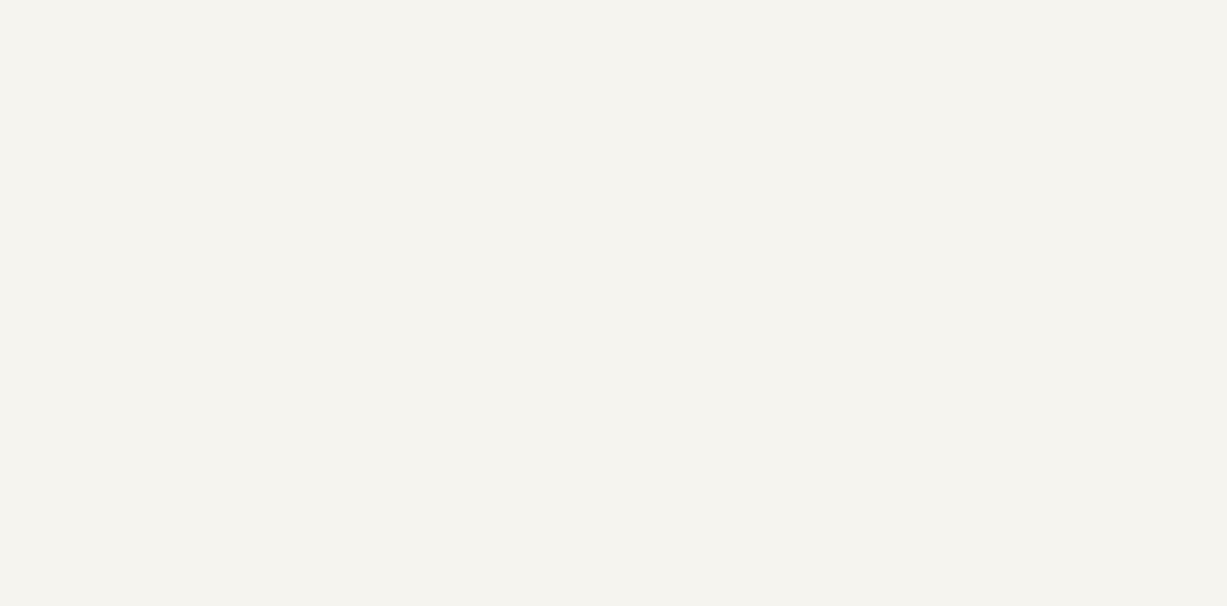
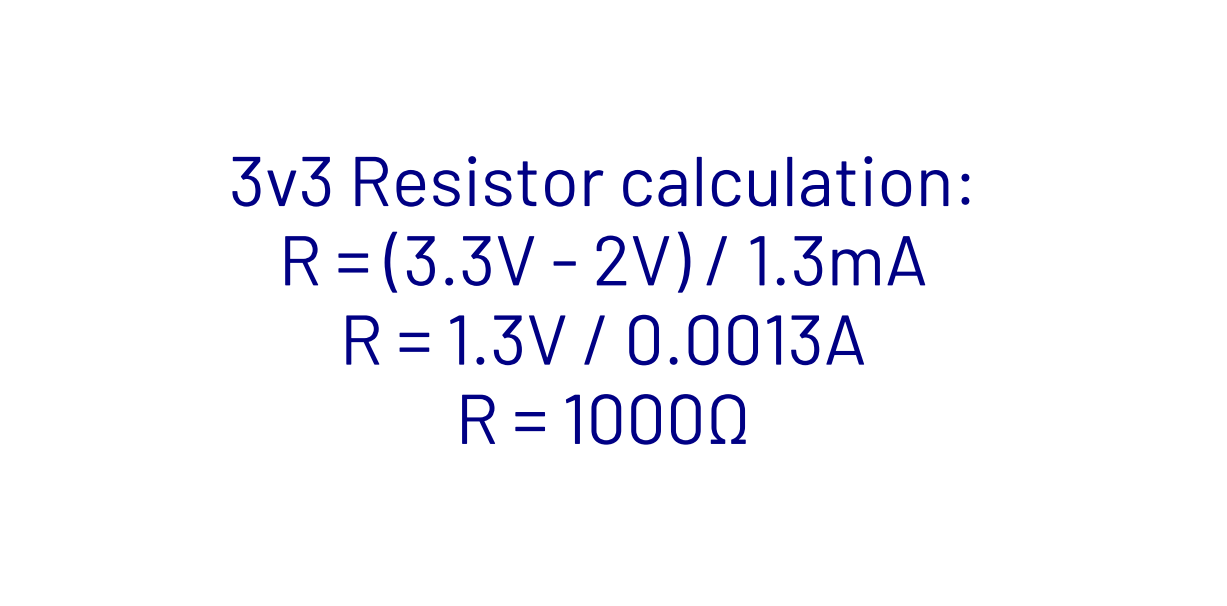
text: none -> 3v3 Resistor calculation: (600, 181)
text: none -> R = (3.3V - 2V) / 1.3mA (605, 262)
text: none -> R = 1.3V / 0.0013A (605, 340)
text: none -> R = 1000Ω (603, 419)

